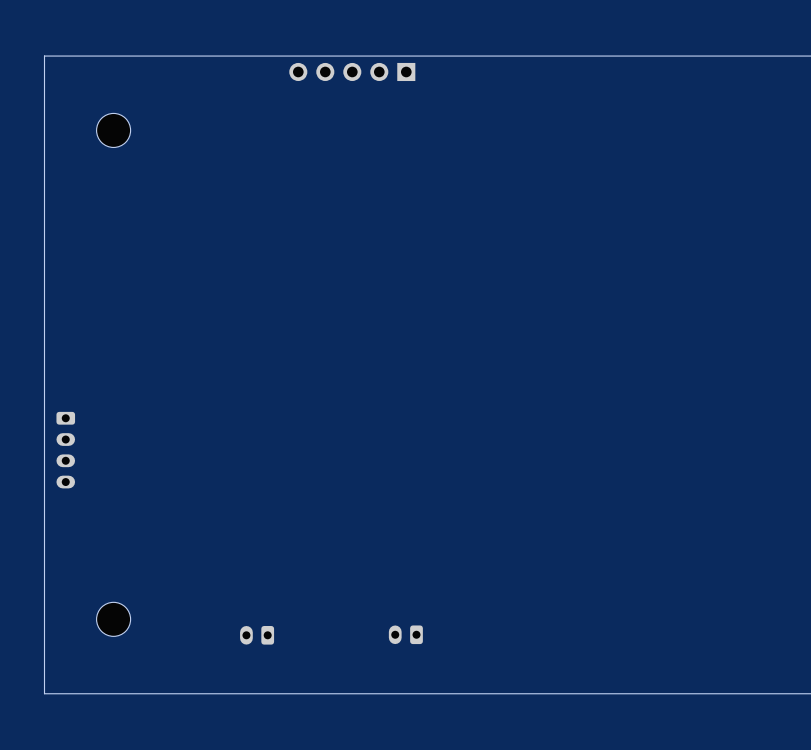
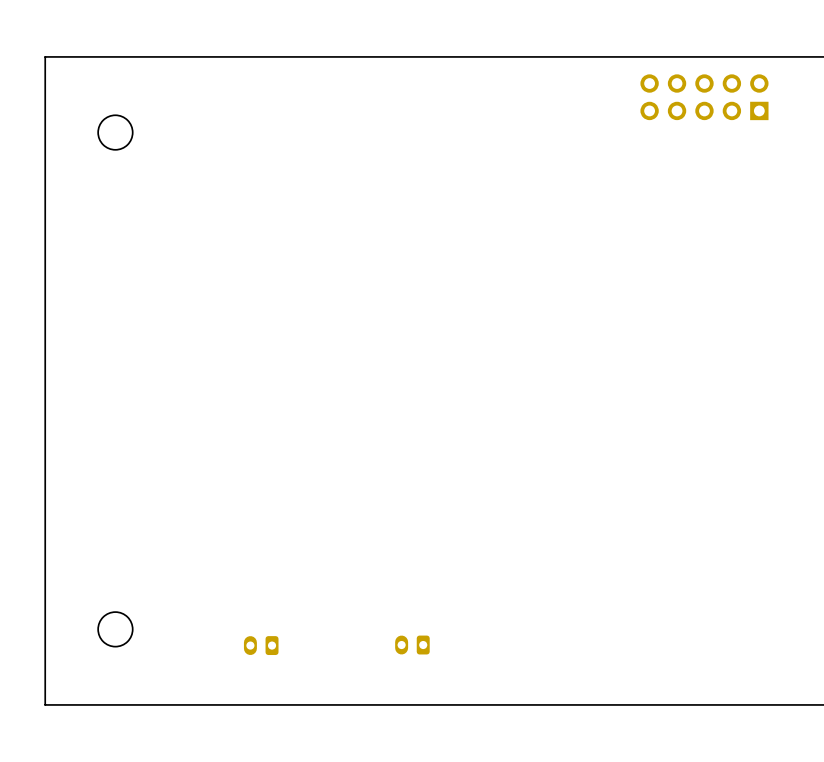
part: (352, 71) -> none
part: none -> (704, 97)
part: (65, 450) -> none

